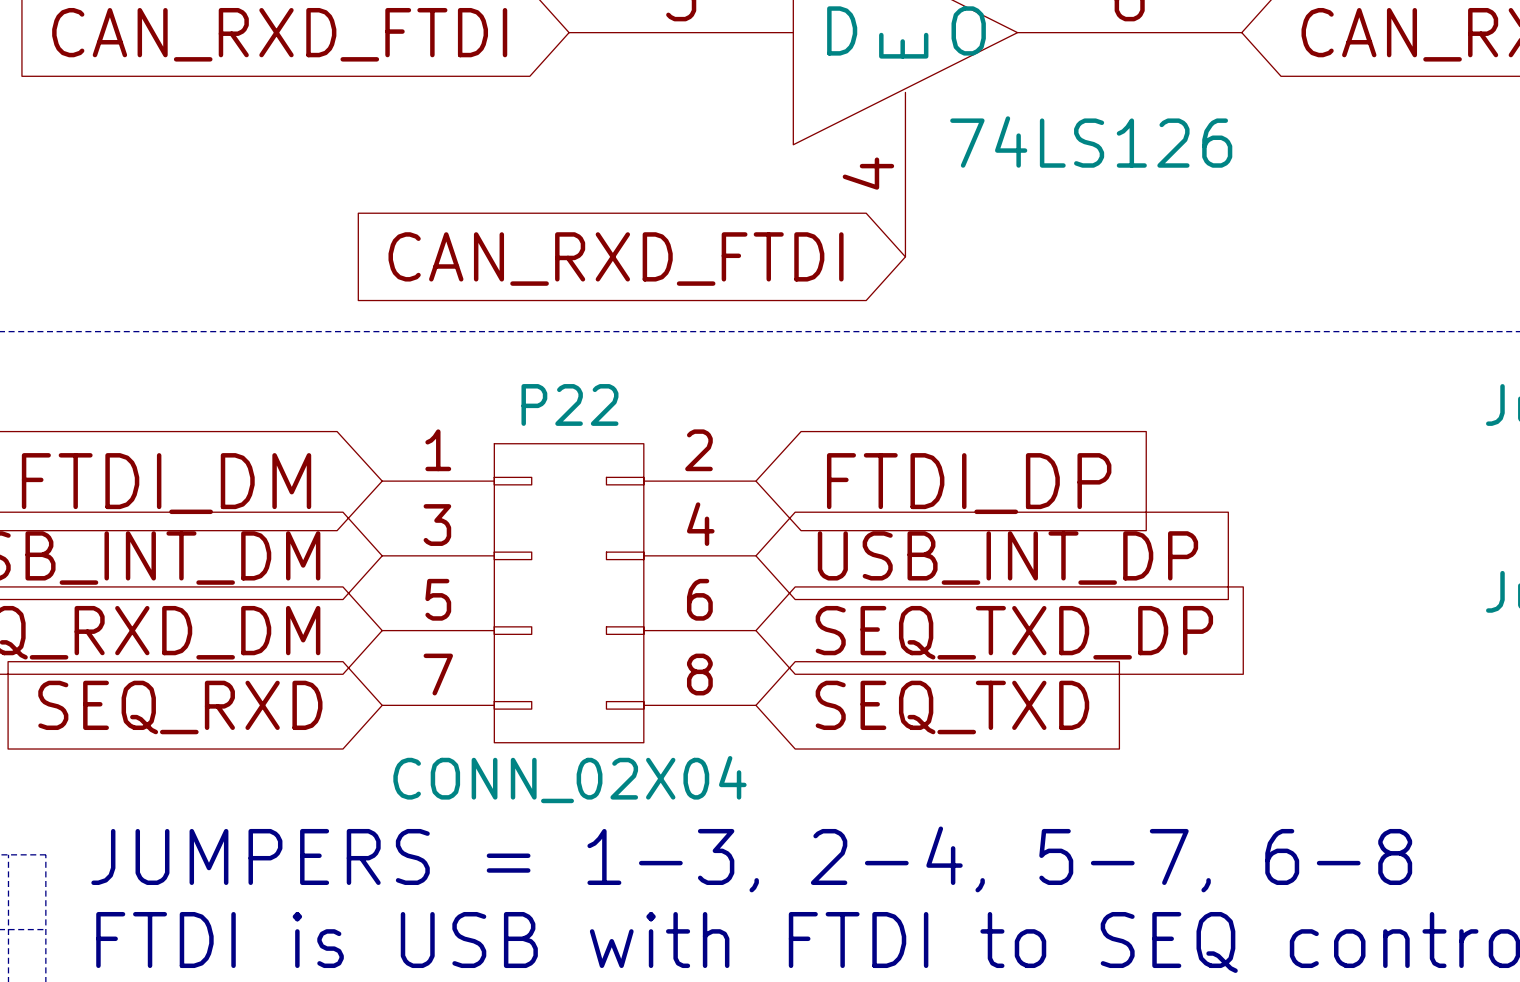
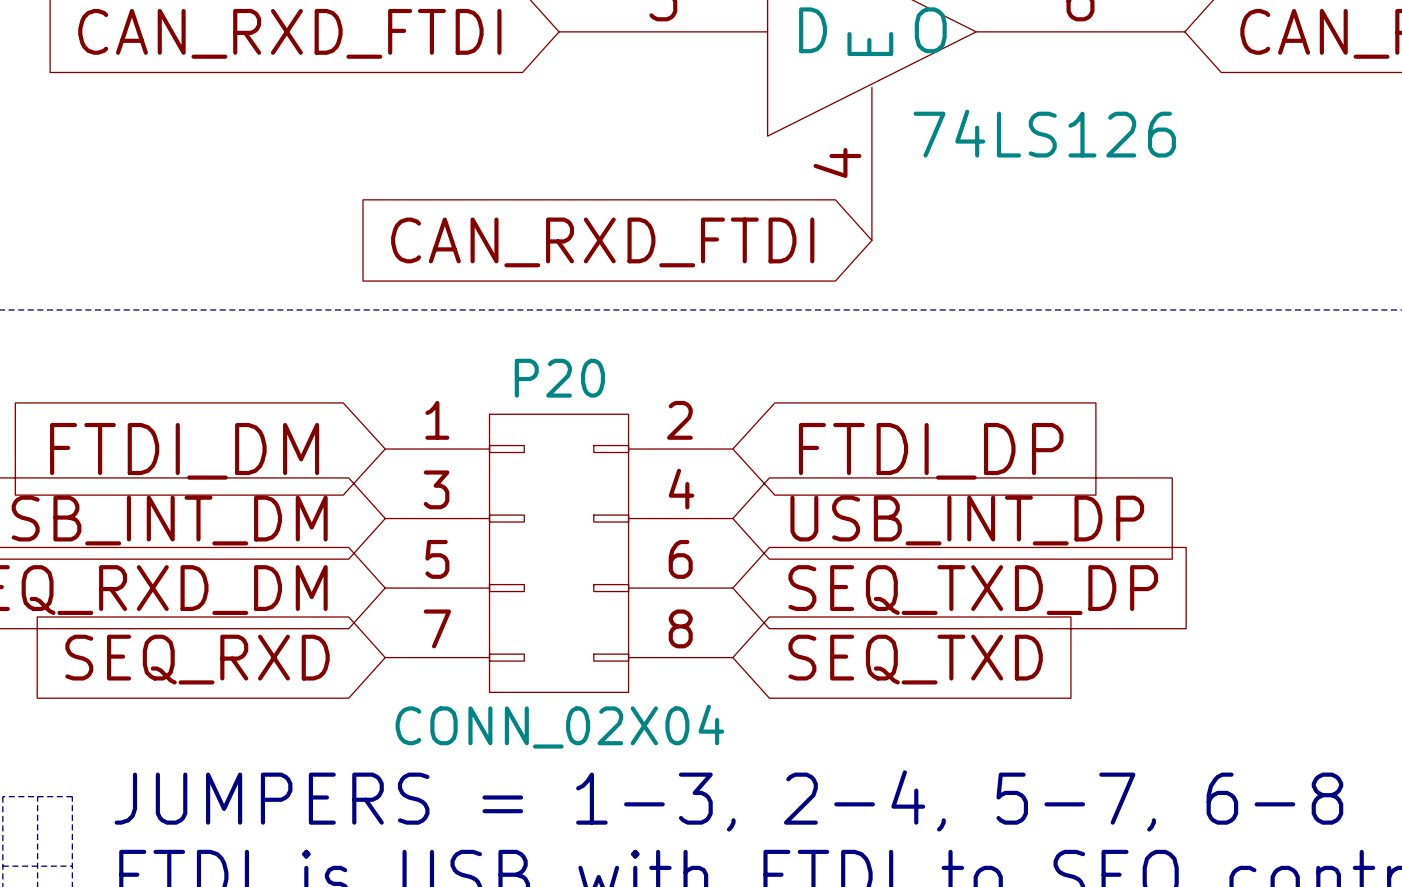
P22 name: P22 (569, 404) -> P20 (559, 378)

